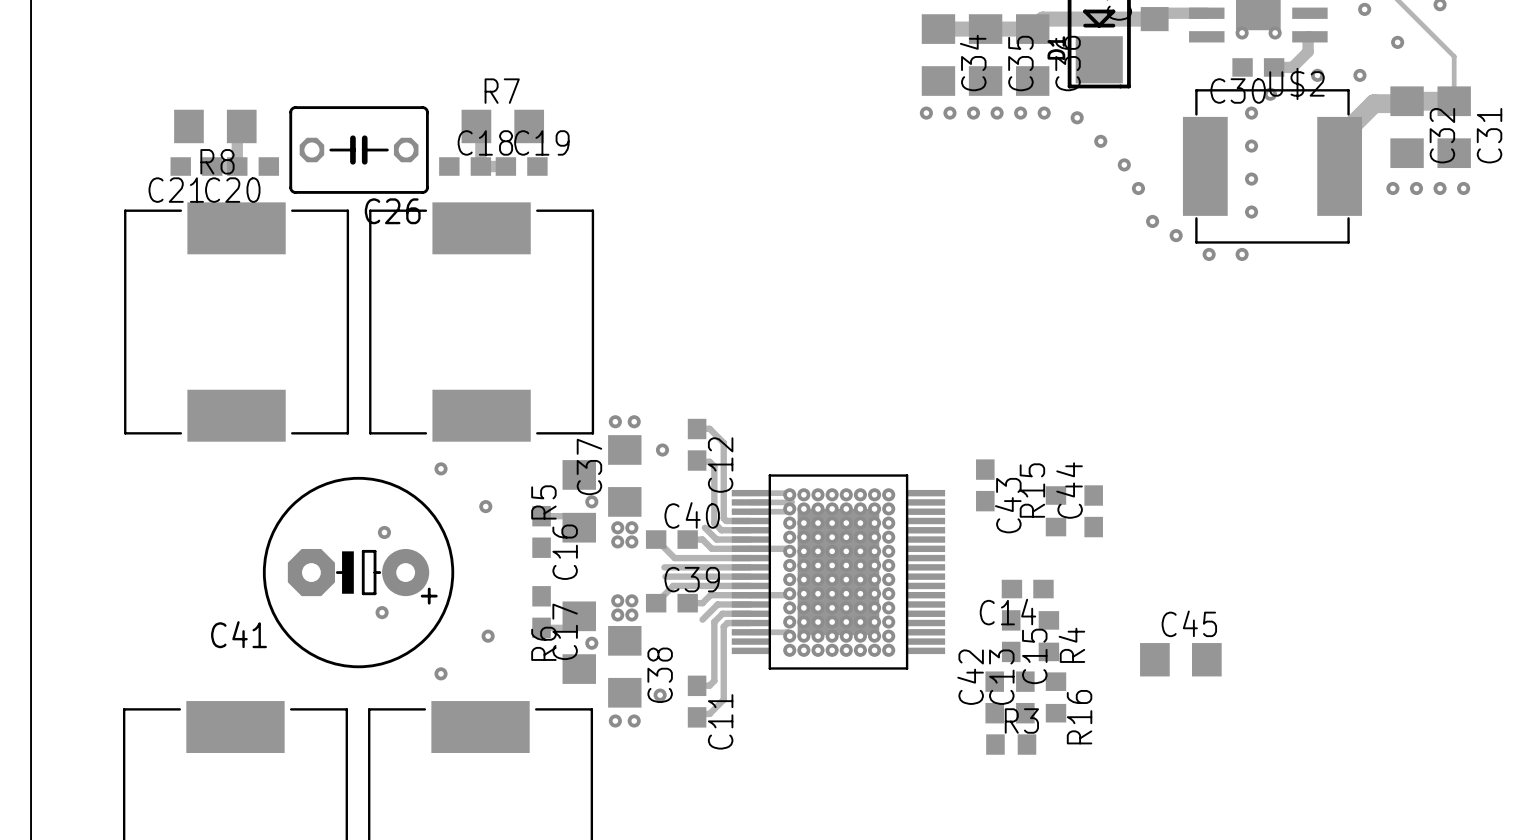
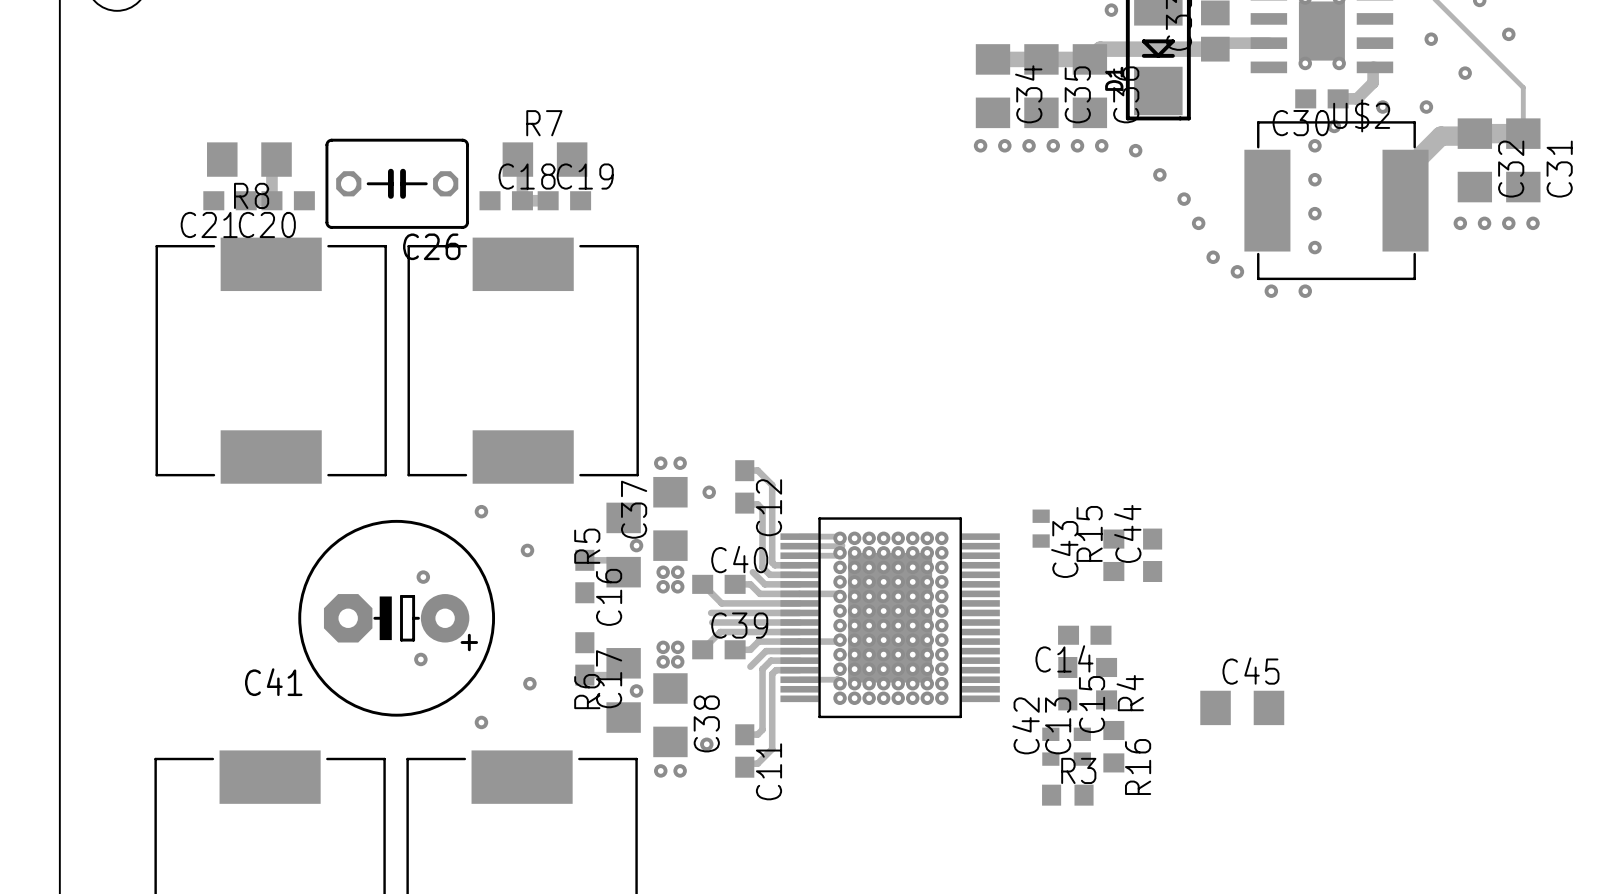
C43 footprint: [976, 459, 995, 512] -> [1032, 509, 1050, 548]
C42 footprint: [985, 671, 1005, 724] -> [1042, 727, 1060, 766]
C13 footprint: [1016, 671, 1035, 724] -> [1073, 727, 1091, 766]

